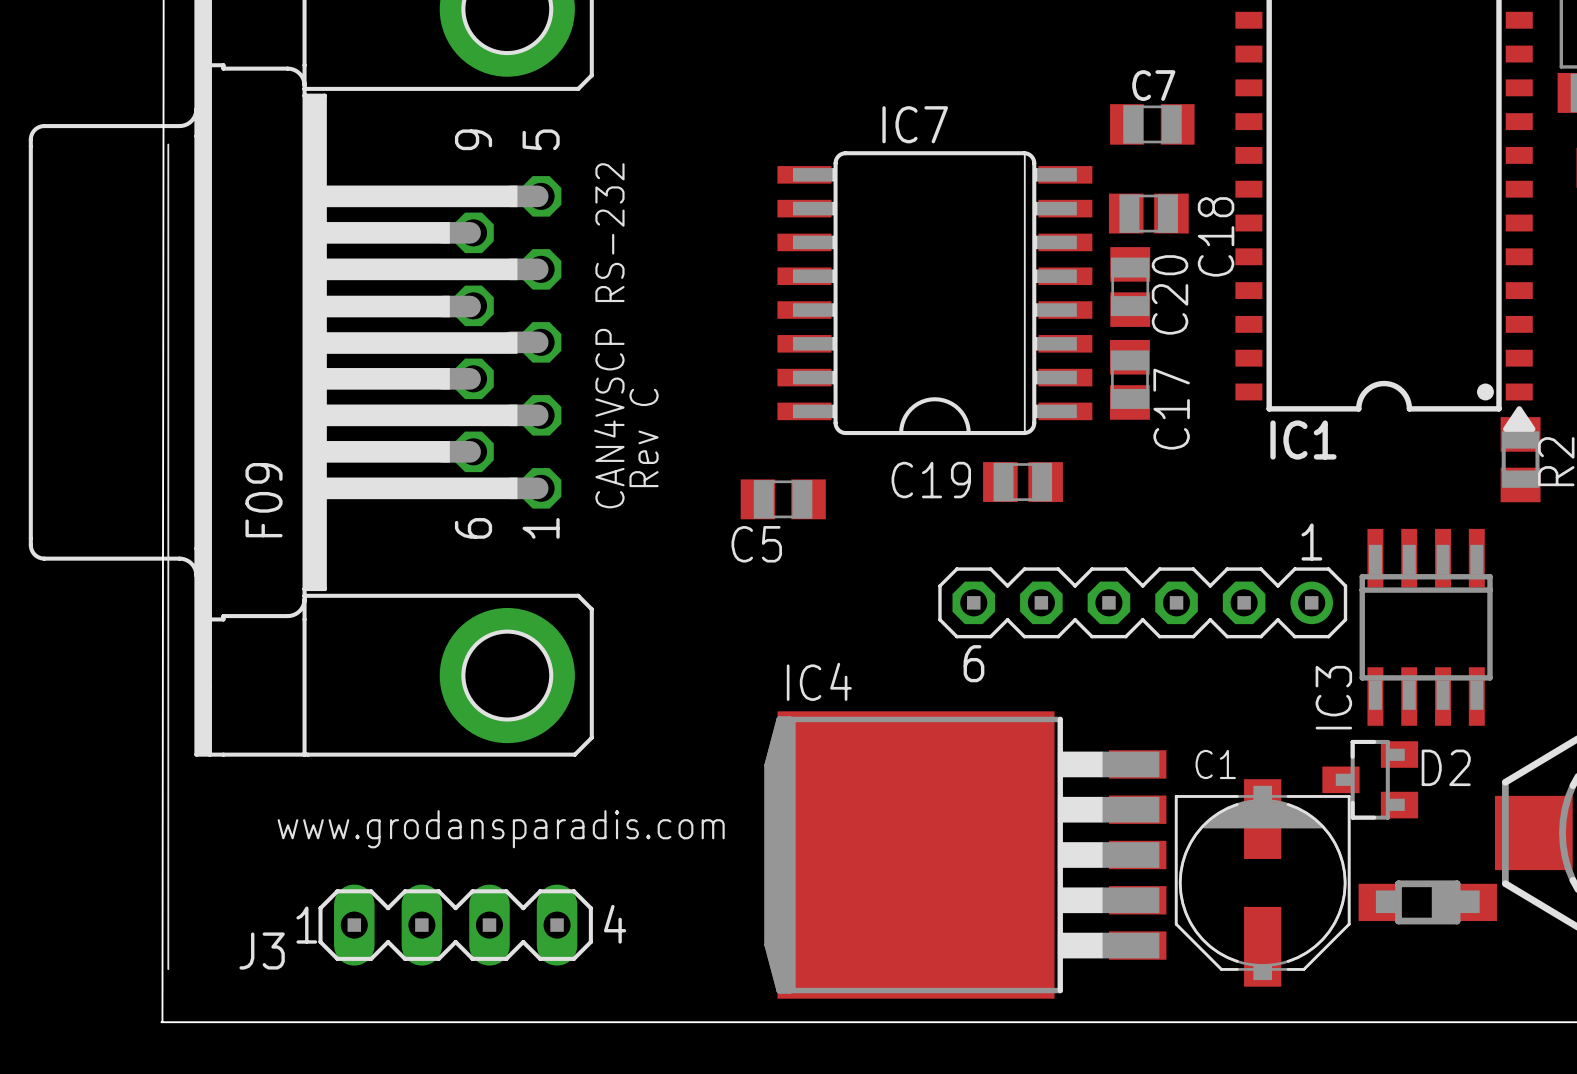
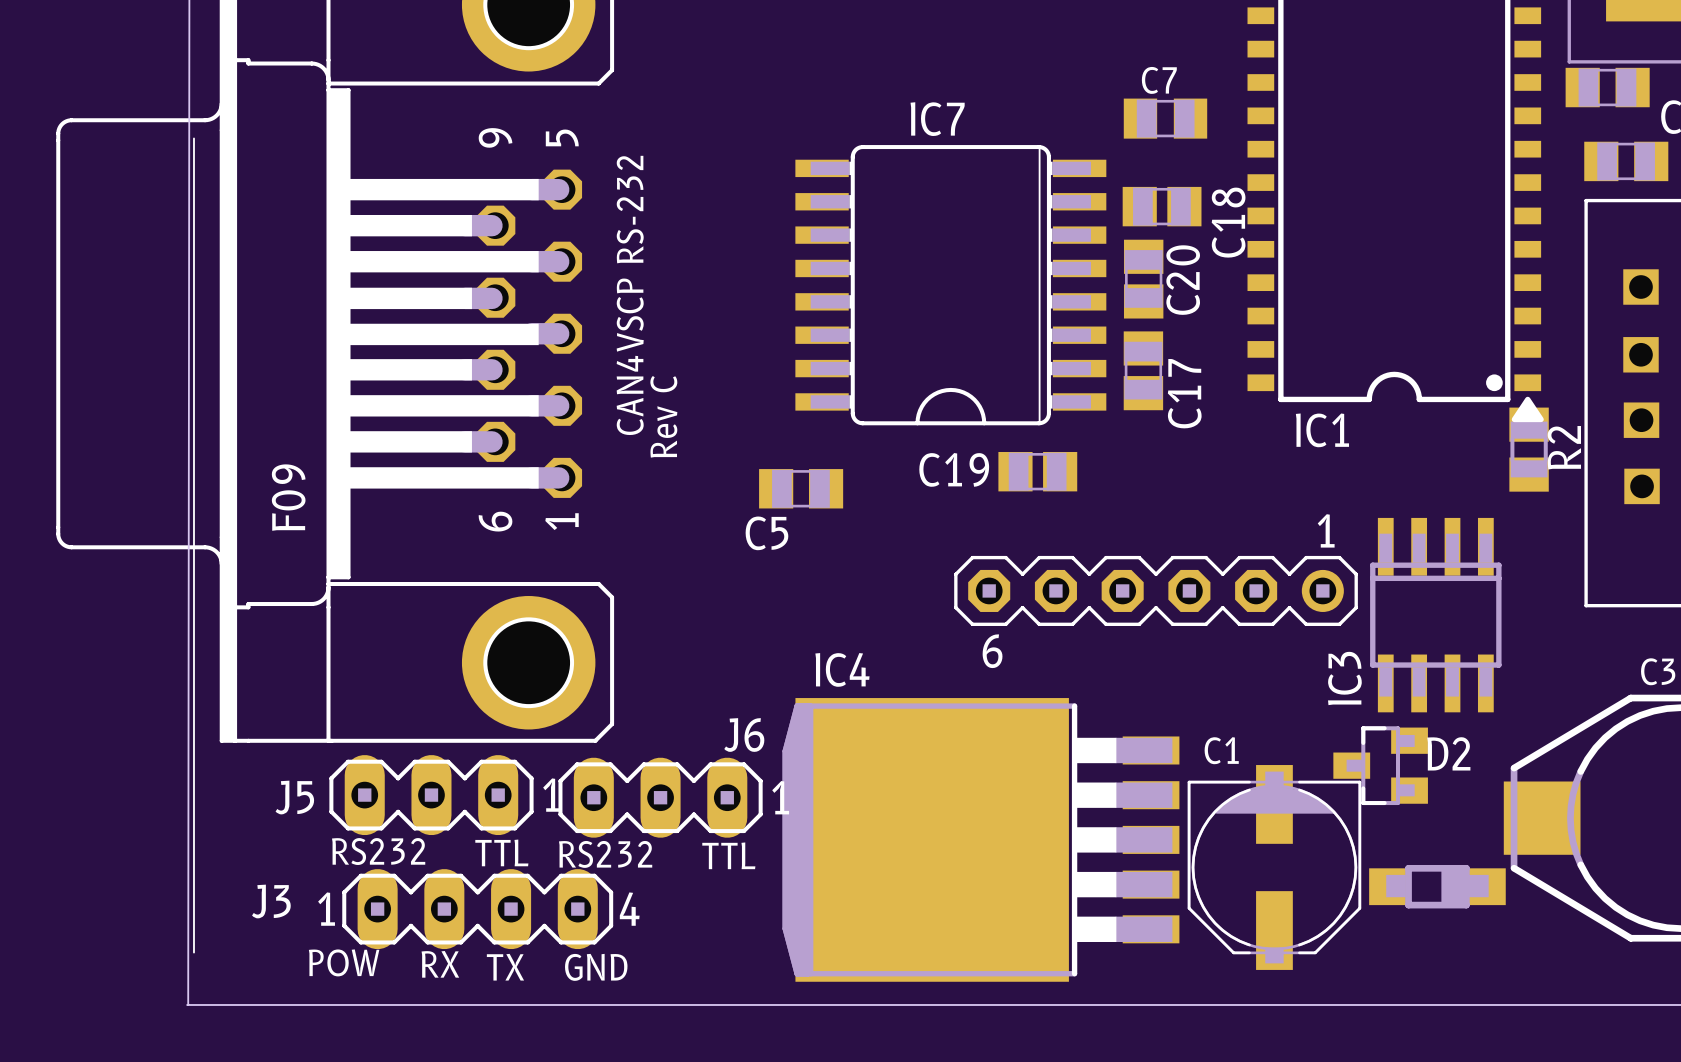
J5: none -> (431, 795)
J6: none -> (660, 797)
text: www.grodansparadis.com (501, 829) -> none
text: none -> RS232 (378, 851)
text: none -> TTL (501, 852)
text: none -> RS232 (605, 854)
text: none -> TTL (728, 855)
J3 name position: J3 (262, 951) -> J3 (271, 901)
text: none -> POW (344, 962)
text: none -> RX (440, 964)
text: none -> TX (505, 967)
text: none -> GND (596, 967)

